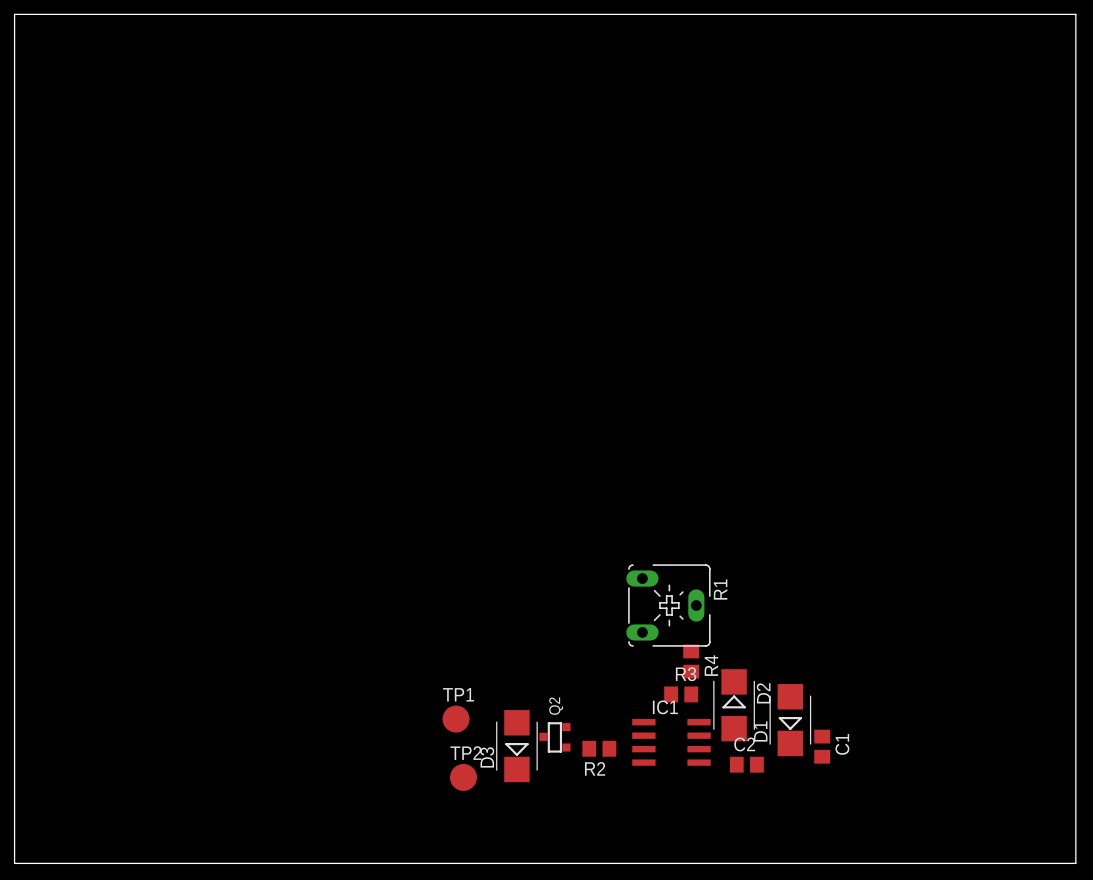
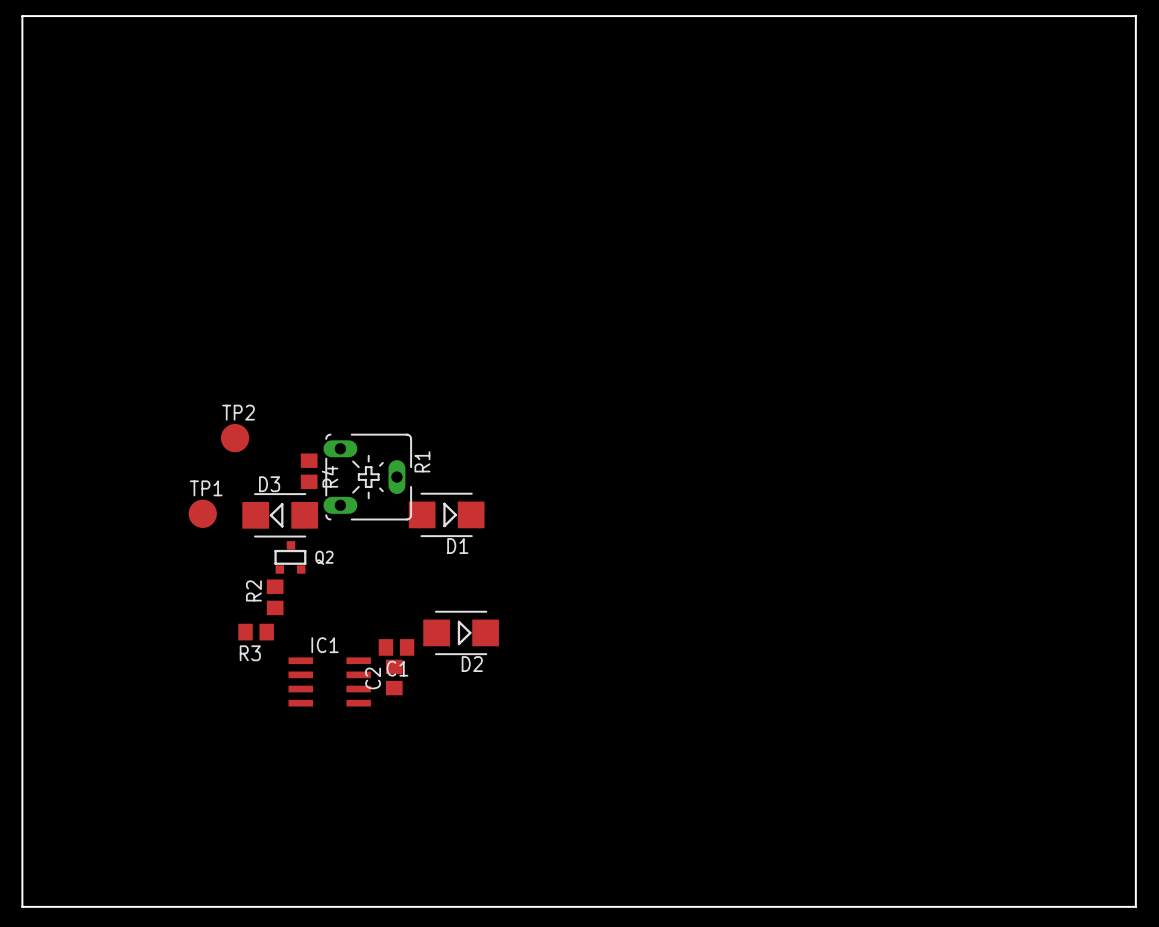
R1 position: (668, 605) -> (367, 477)
R4 position: (691, 661) -> (309, 471)
R3 name position: R3 (686, 674) -> R3 (250, 653)
R3 position: (681, 694) -> (256, 632)
D2 rotation: 0° (734, 705) -> 90° clockwise (461, 632)
D2 position: (734, 705) -> (461, 632)
TP1 position: (456, 719) -> (202, 513)
D1 rotation: 0° (790, 720) -> 90° counterclockwise (446, 514)
D1 position: (790, 720) -> (446, 514)
Q2 rotation: 0° (554, 737) -> 90° clockwise (290, 557)
Q2 position: (554, 737) -> (290, 557)
IC1 position: (671, 742) -> (329, 681)
C2 name position: C2 (744, 744) -> C2 (373, 678)
D3 rotation: 0° (516, 746) -> 90° clockwise (280, 515)
D3 position: (516, 746) -> (280, 515)
C1 rotation: 0° (822, 746) -> 90° clockwise (396, 647)
C1 position: (822, 746) -> (396, 647)
R2 rotation: 0° (599, 748) -> 90° clockwise (275, 597)
R2 position: (599, 748) -> (275, 597)
C2 rotation: 0° (746, 764) -> 90° clockwise (394, 677)
C2 position: (746, 764) -> (394, 677)
TP2 position: (463, 777) -> (235, 438)

